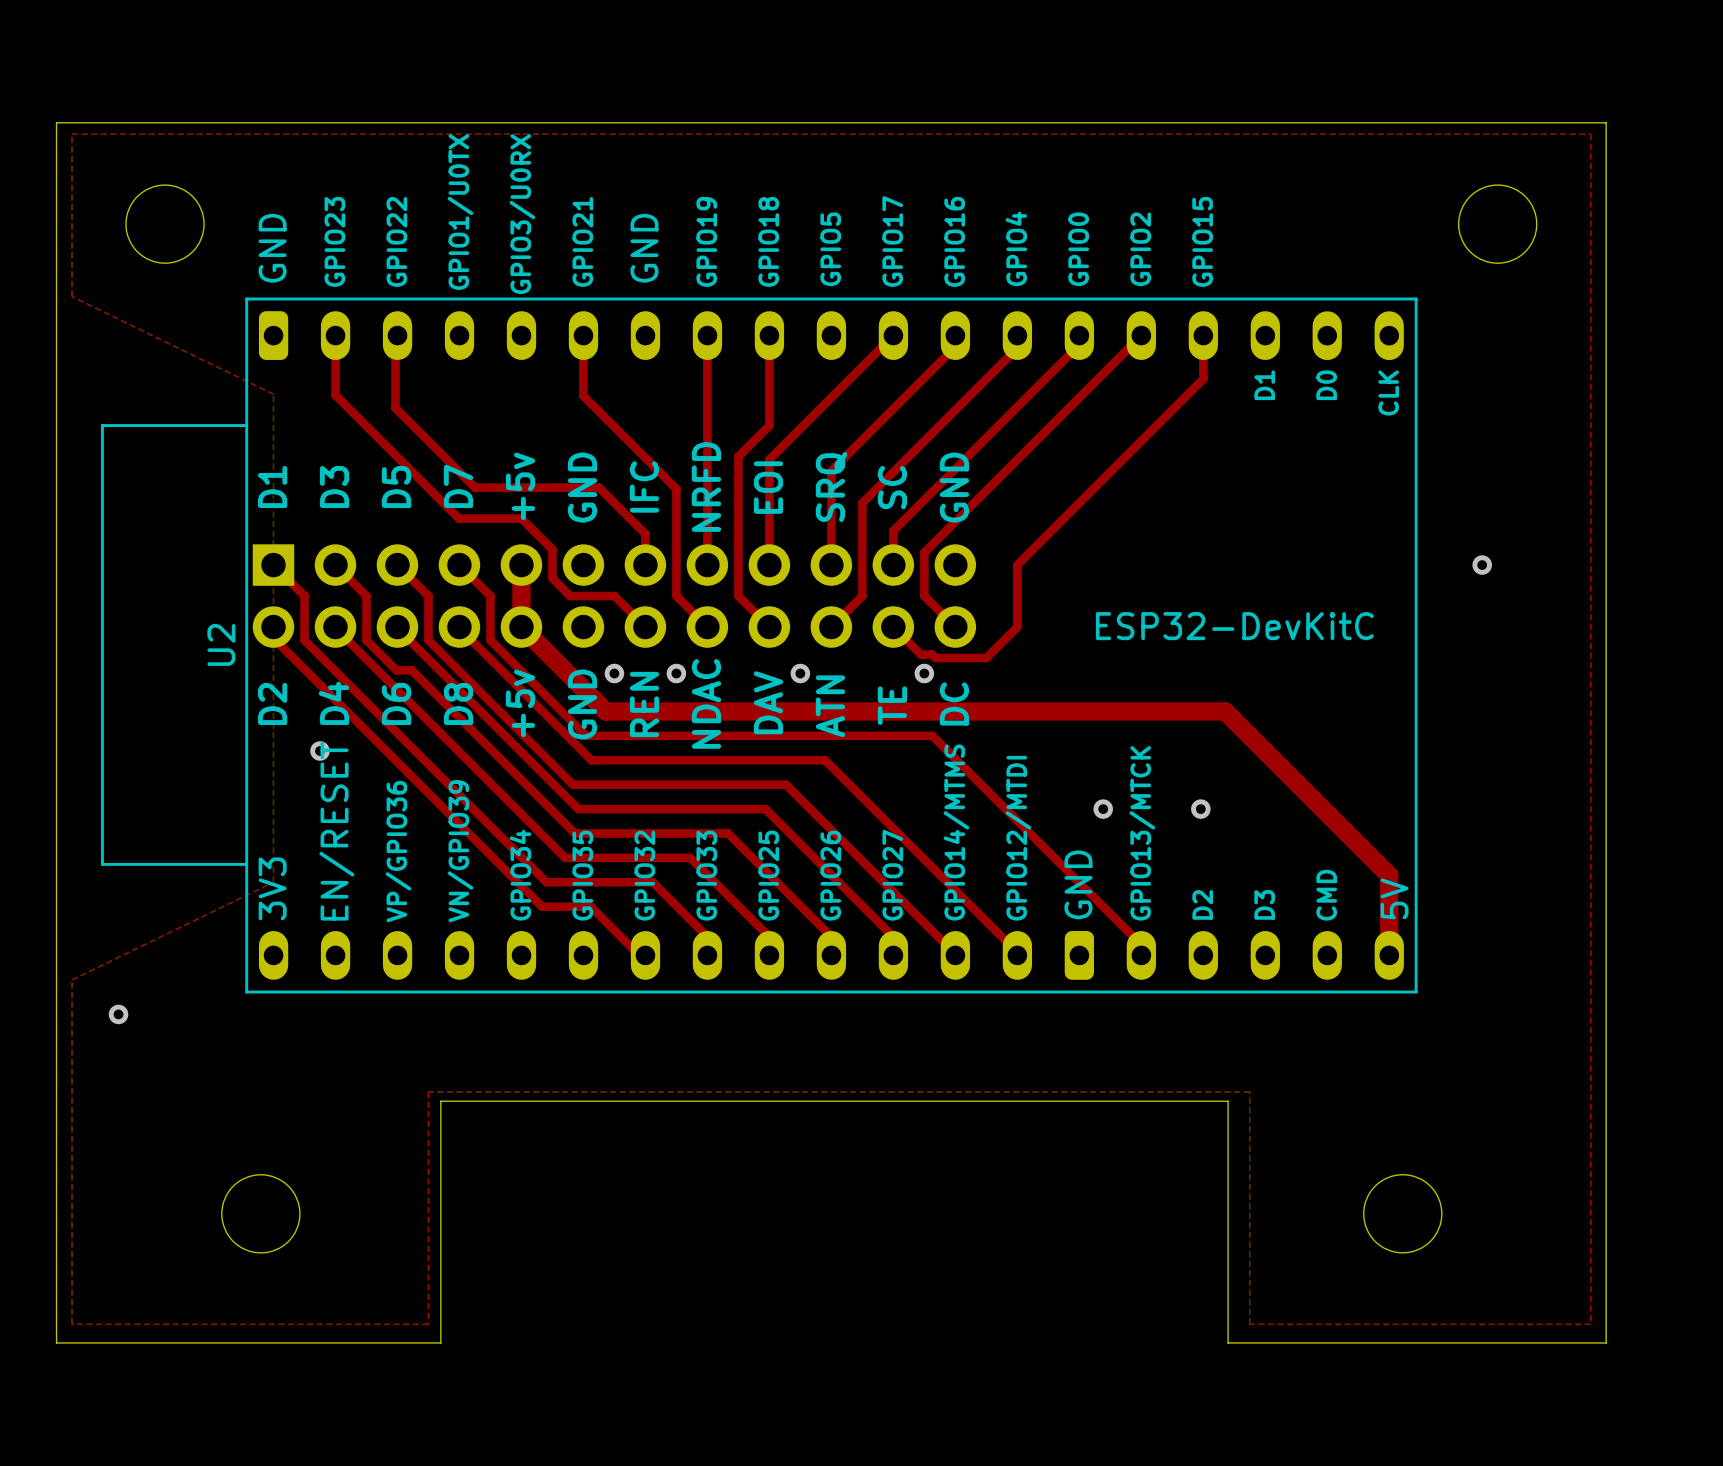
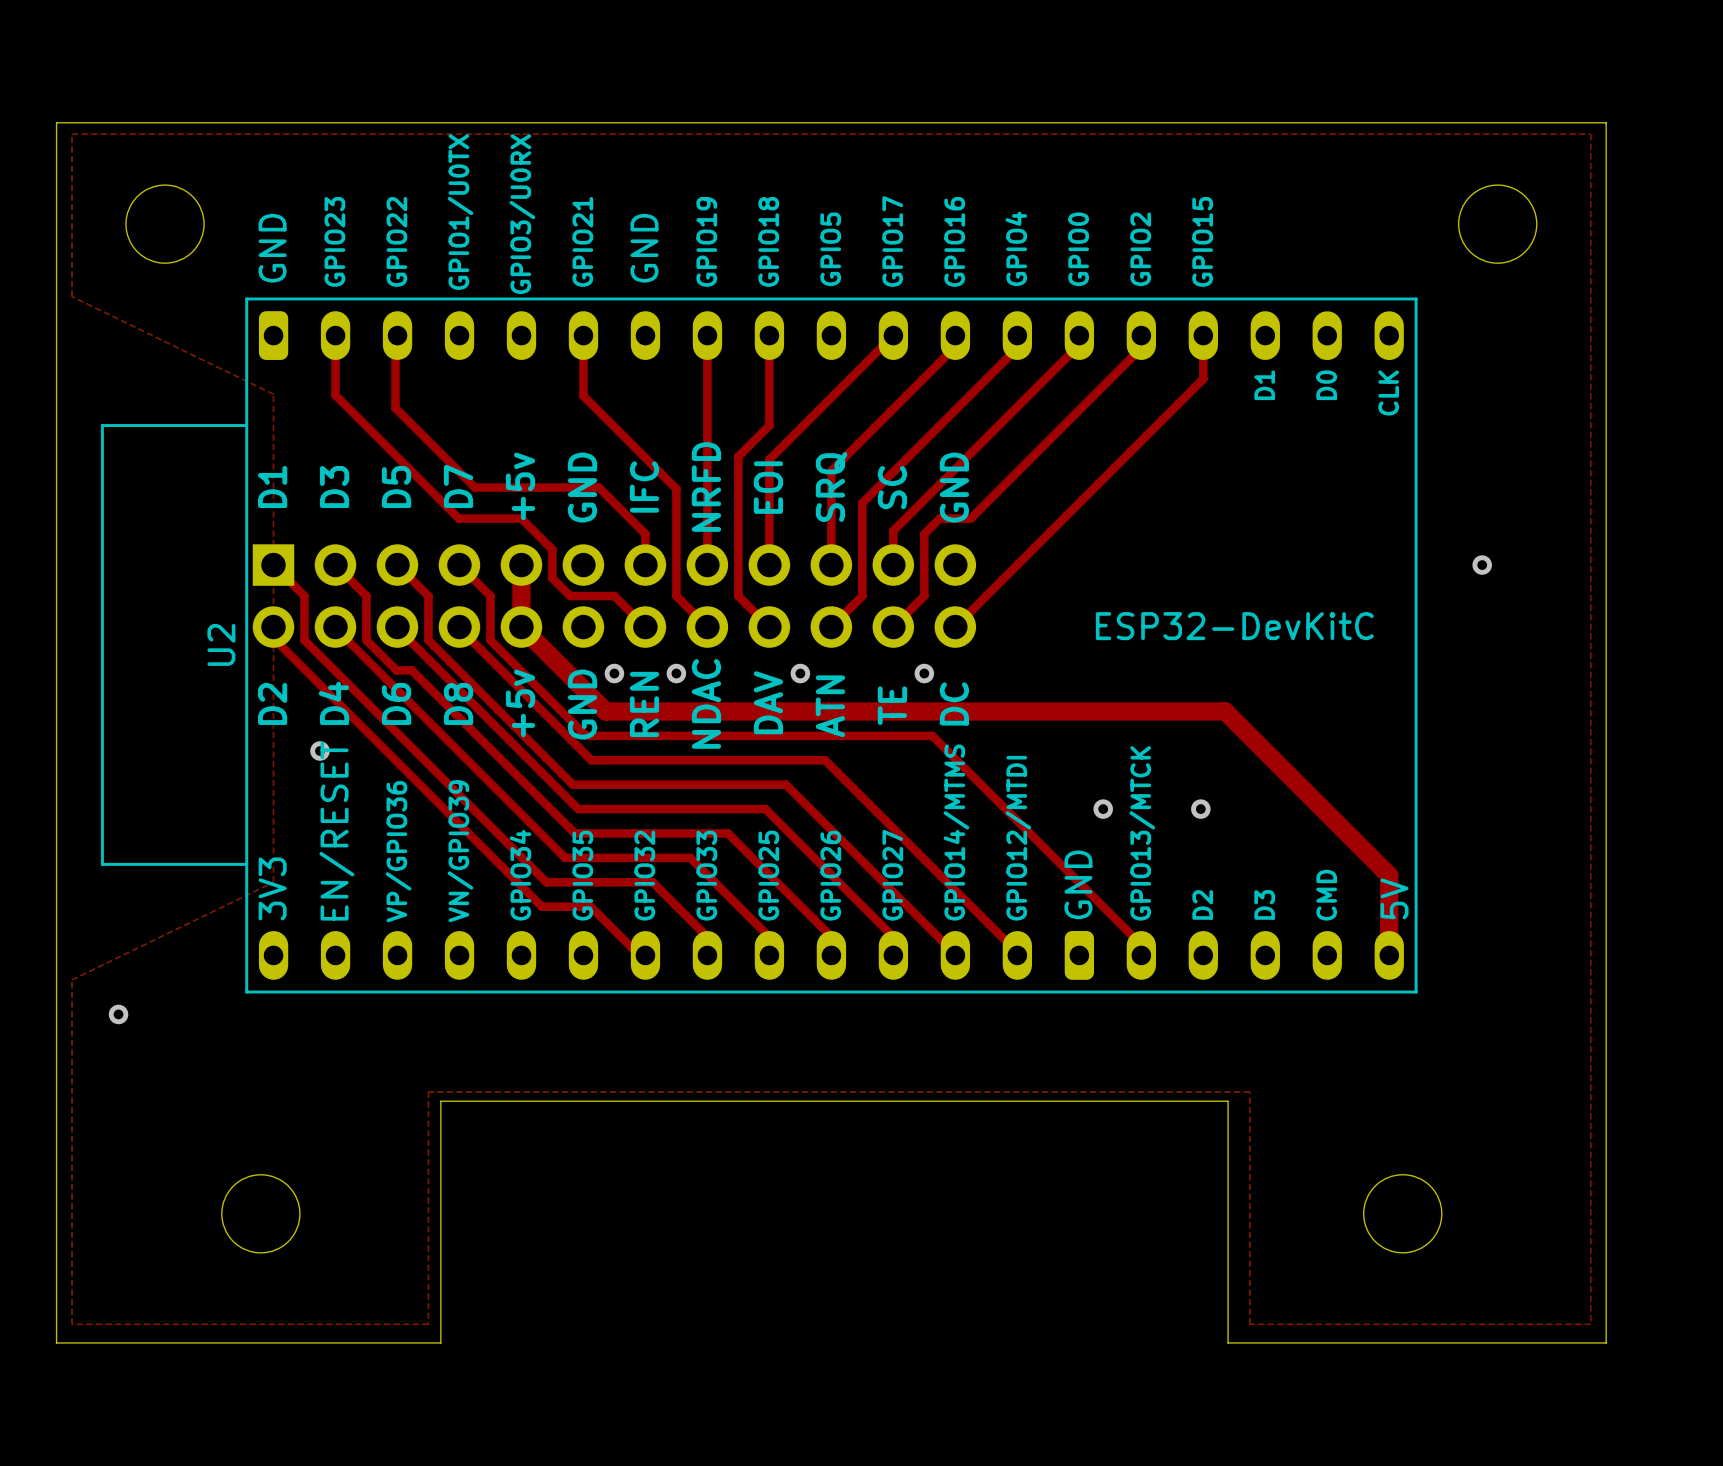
top track: (1141, 335) (924, 552) -> (1141, 348) (970, 518) (939, 518) (924, 534) (924, 552)
top track: (1017, 565) (1017, 627) (986, 658) (935, 658) (932, 654) (920, 654) (893, 627) -> (1017, 565) (955, 627)
top track: (924, 596) (955, 627) -> (924, 596) (893, 627)

